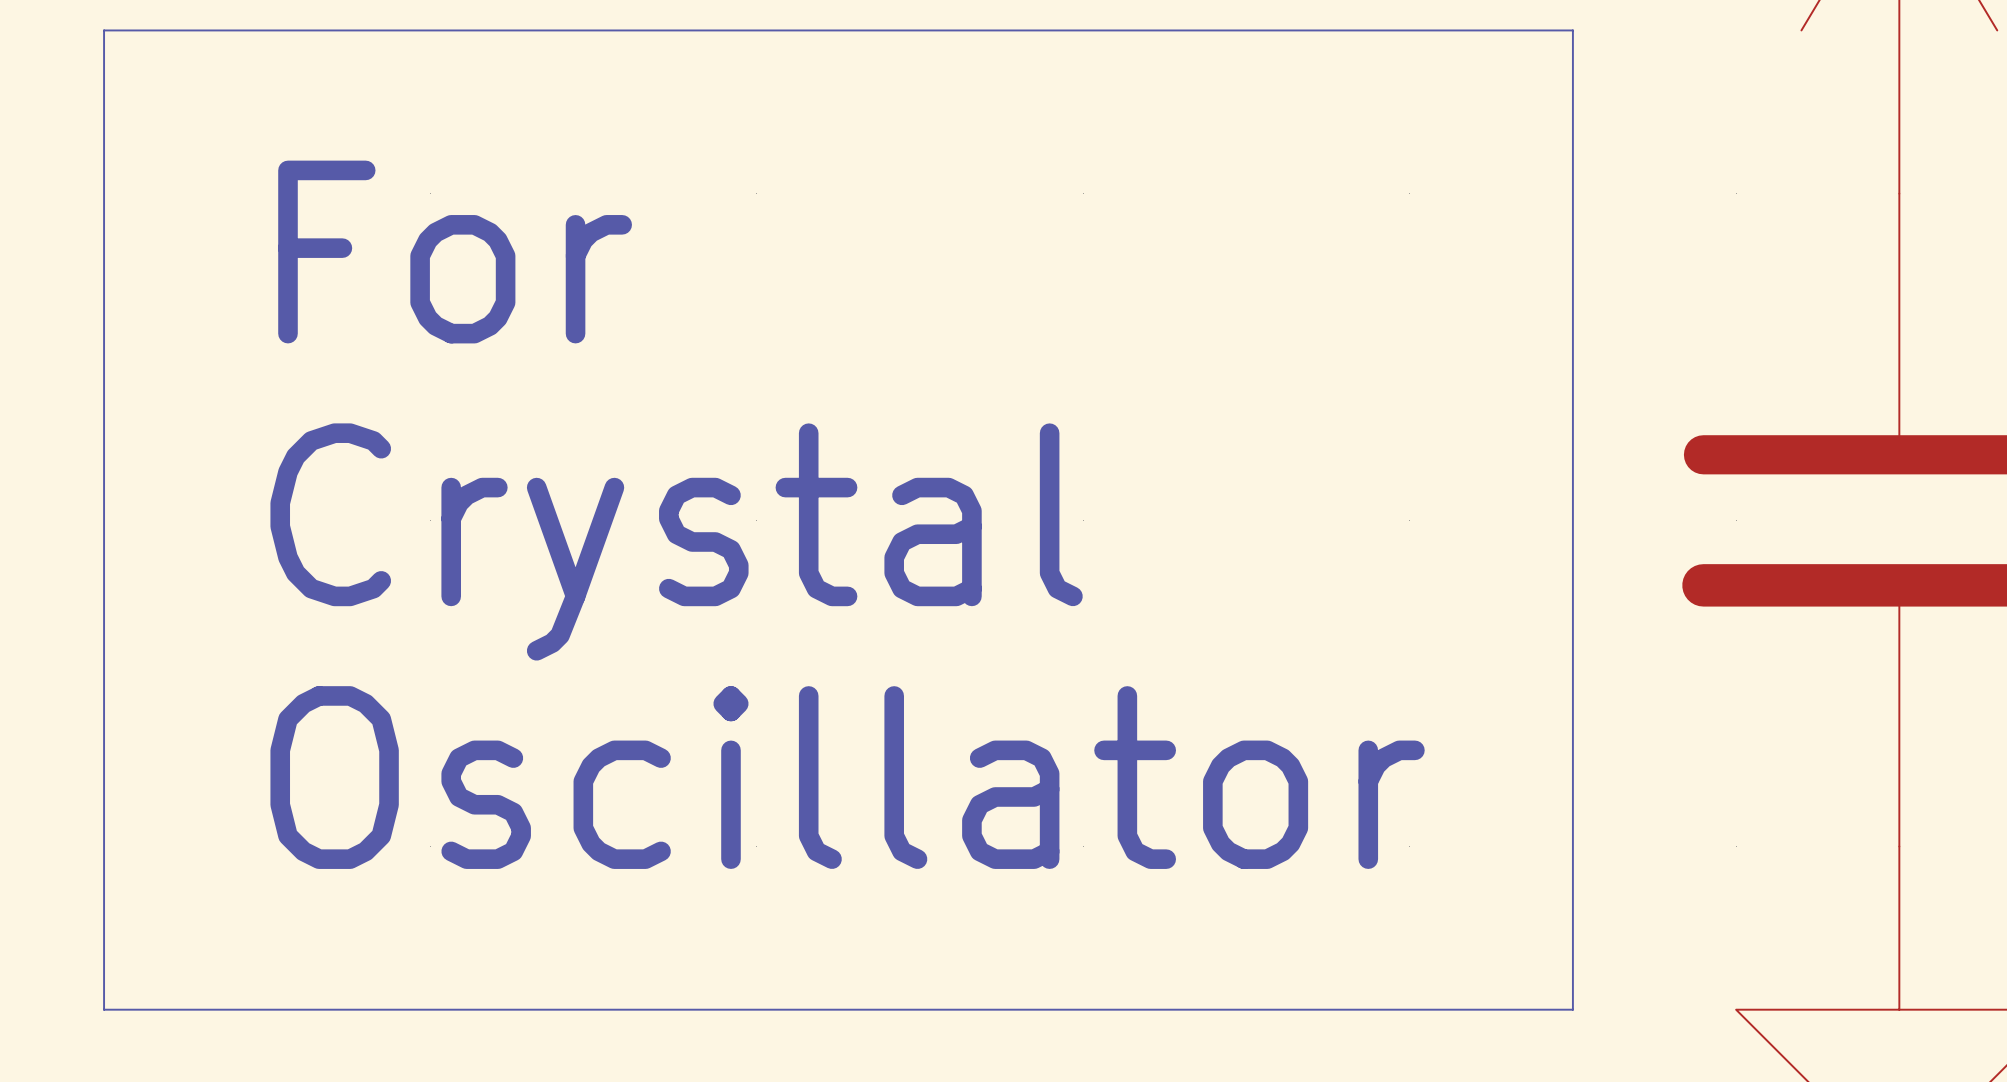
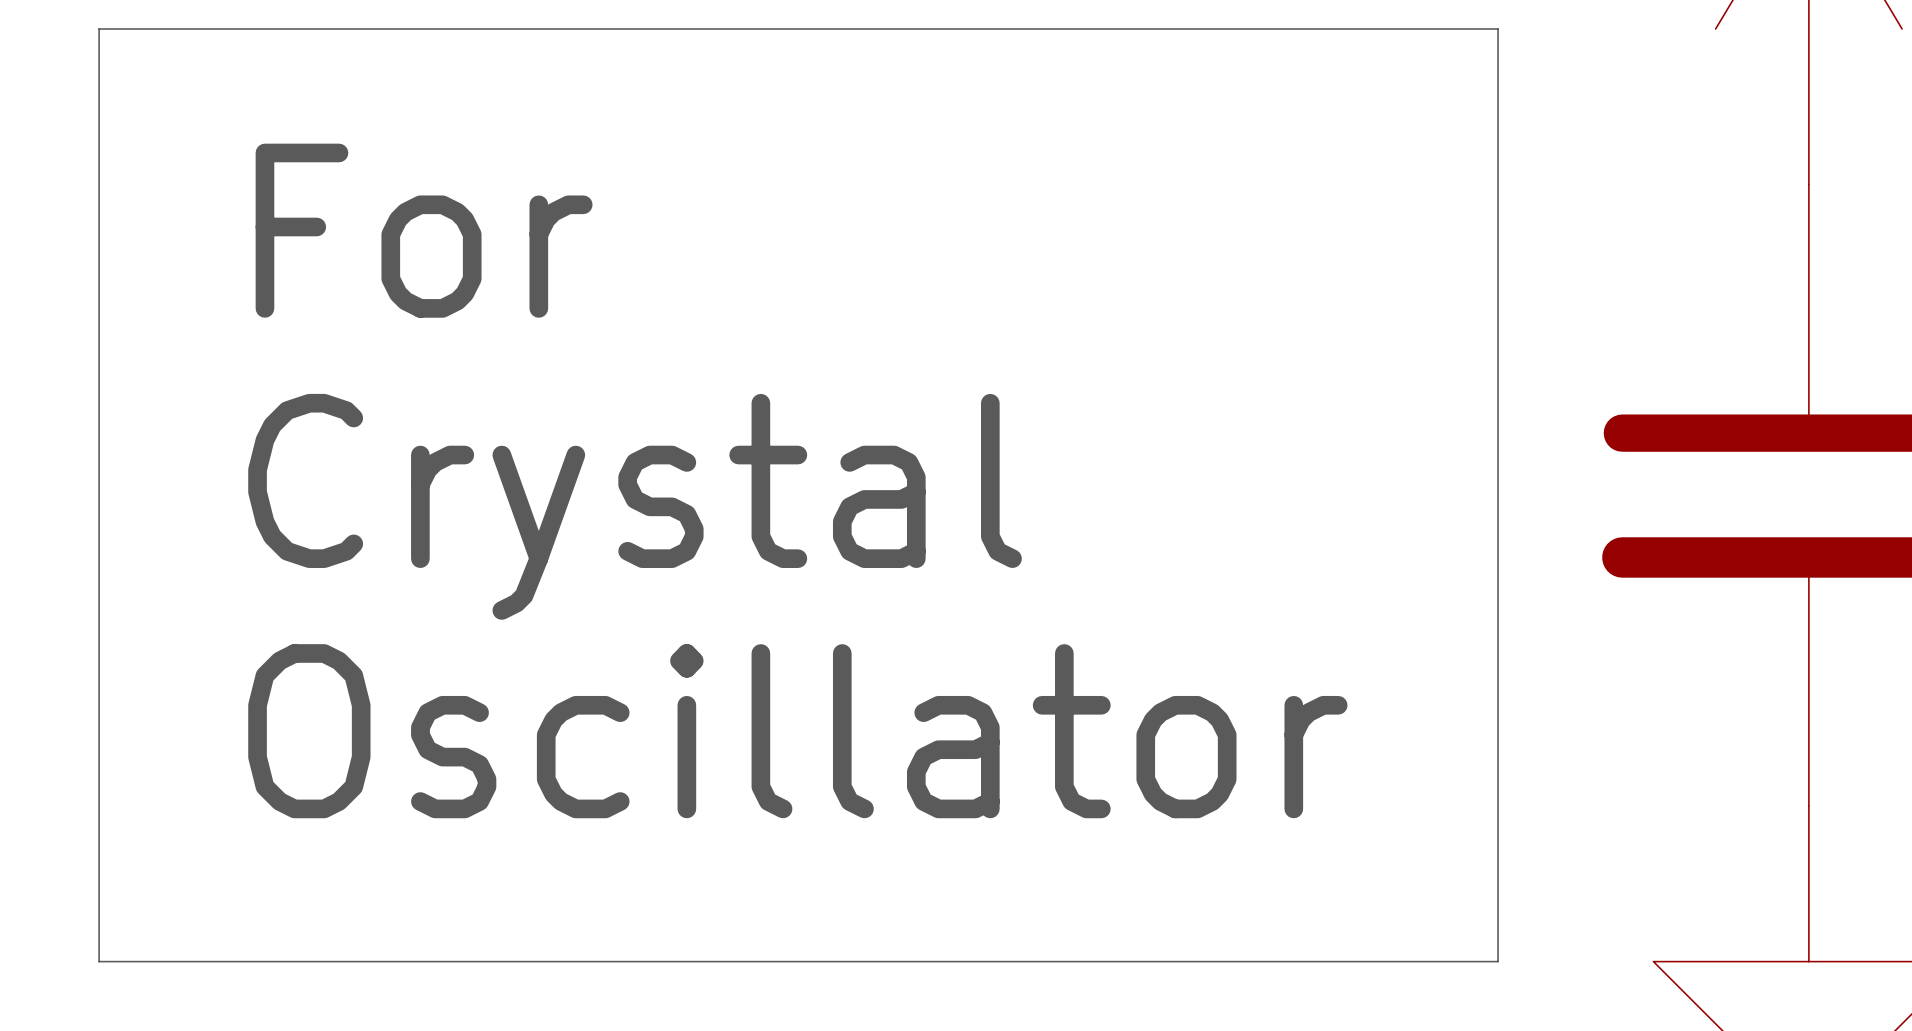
text position: For (455, 252) -> For (424, 230)
text position: Crystal (676, 541) -> Crystal (635, 506)
text position: Oscillator (847, 777) -> Oscillator (797, 731)

